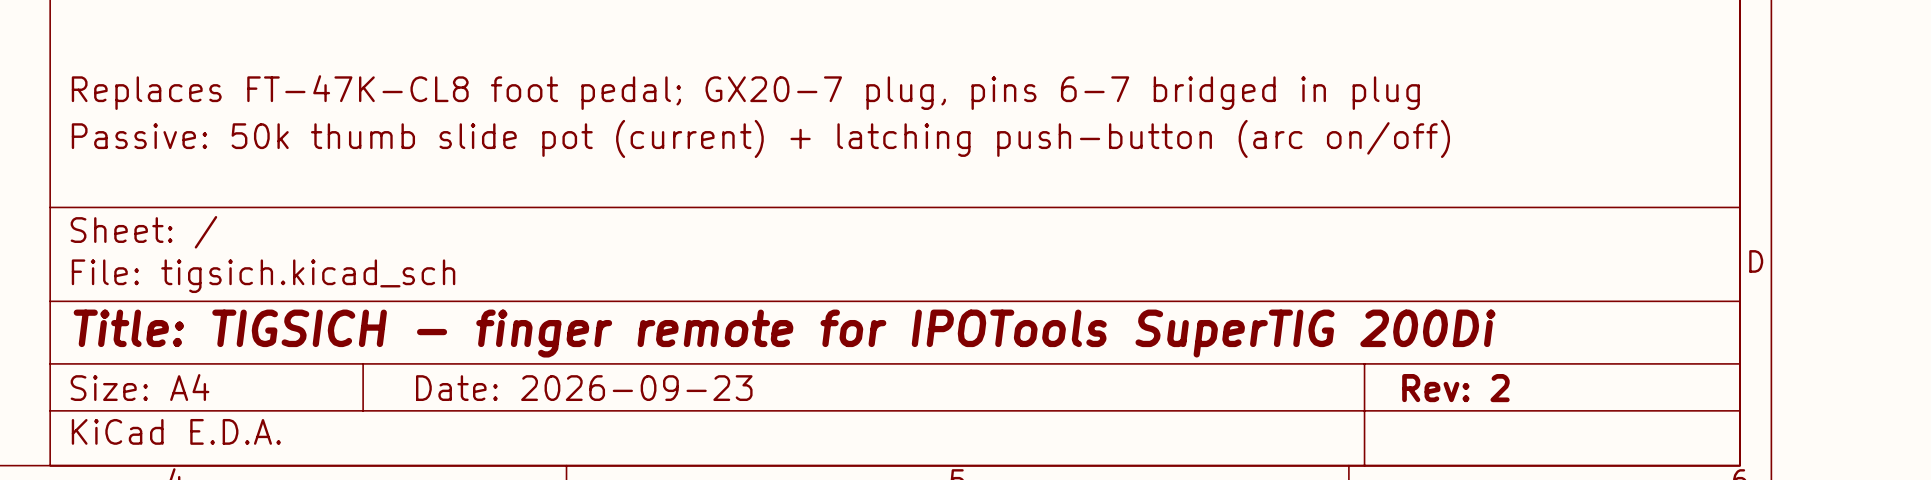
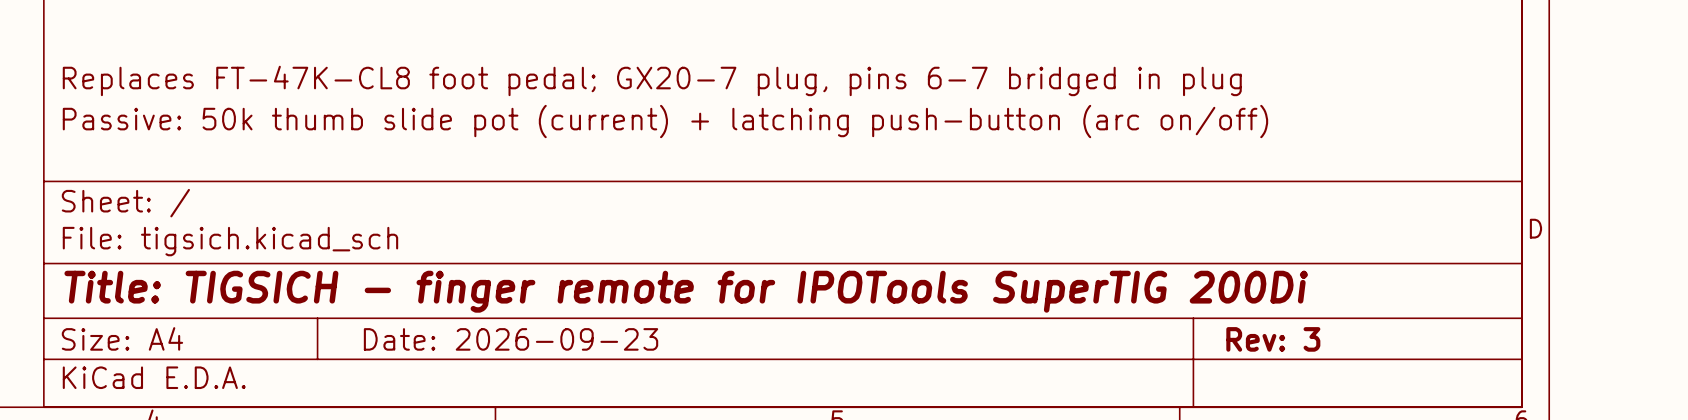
title block: Rev: 2 (1455, 388) -> Rev: 3 (1273, 339)

